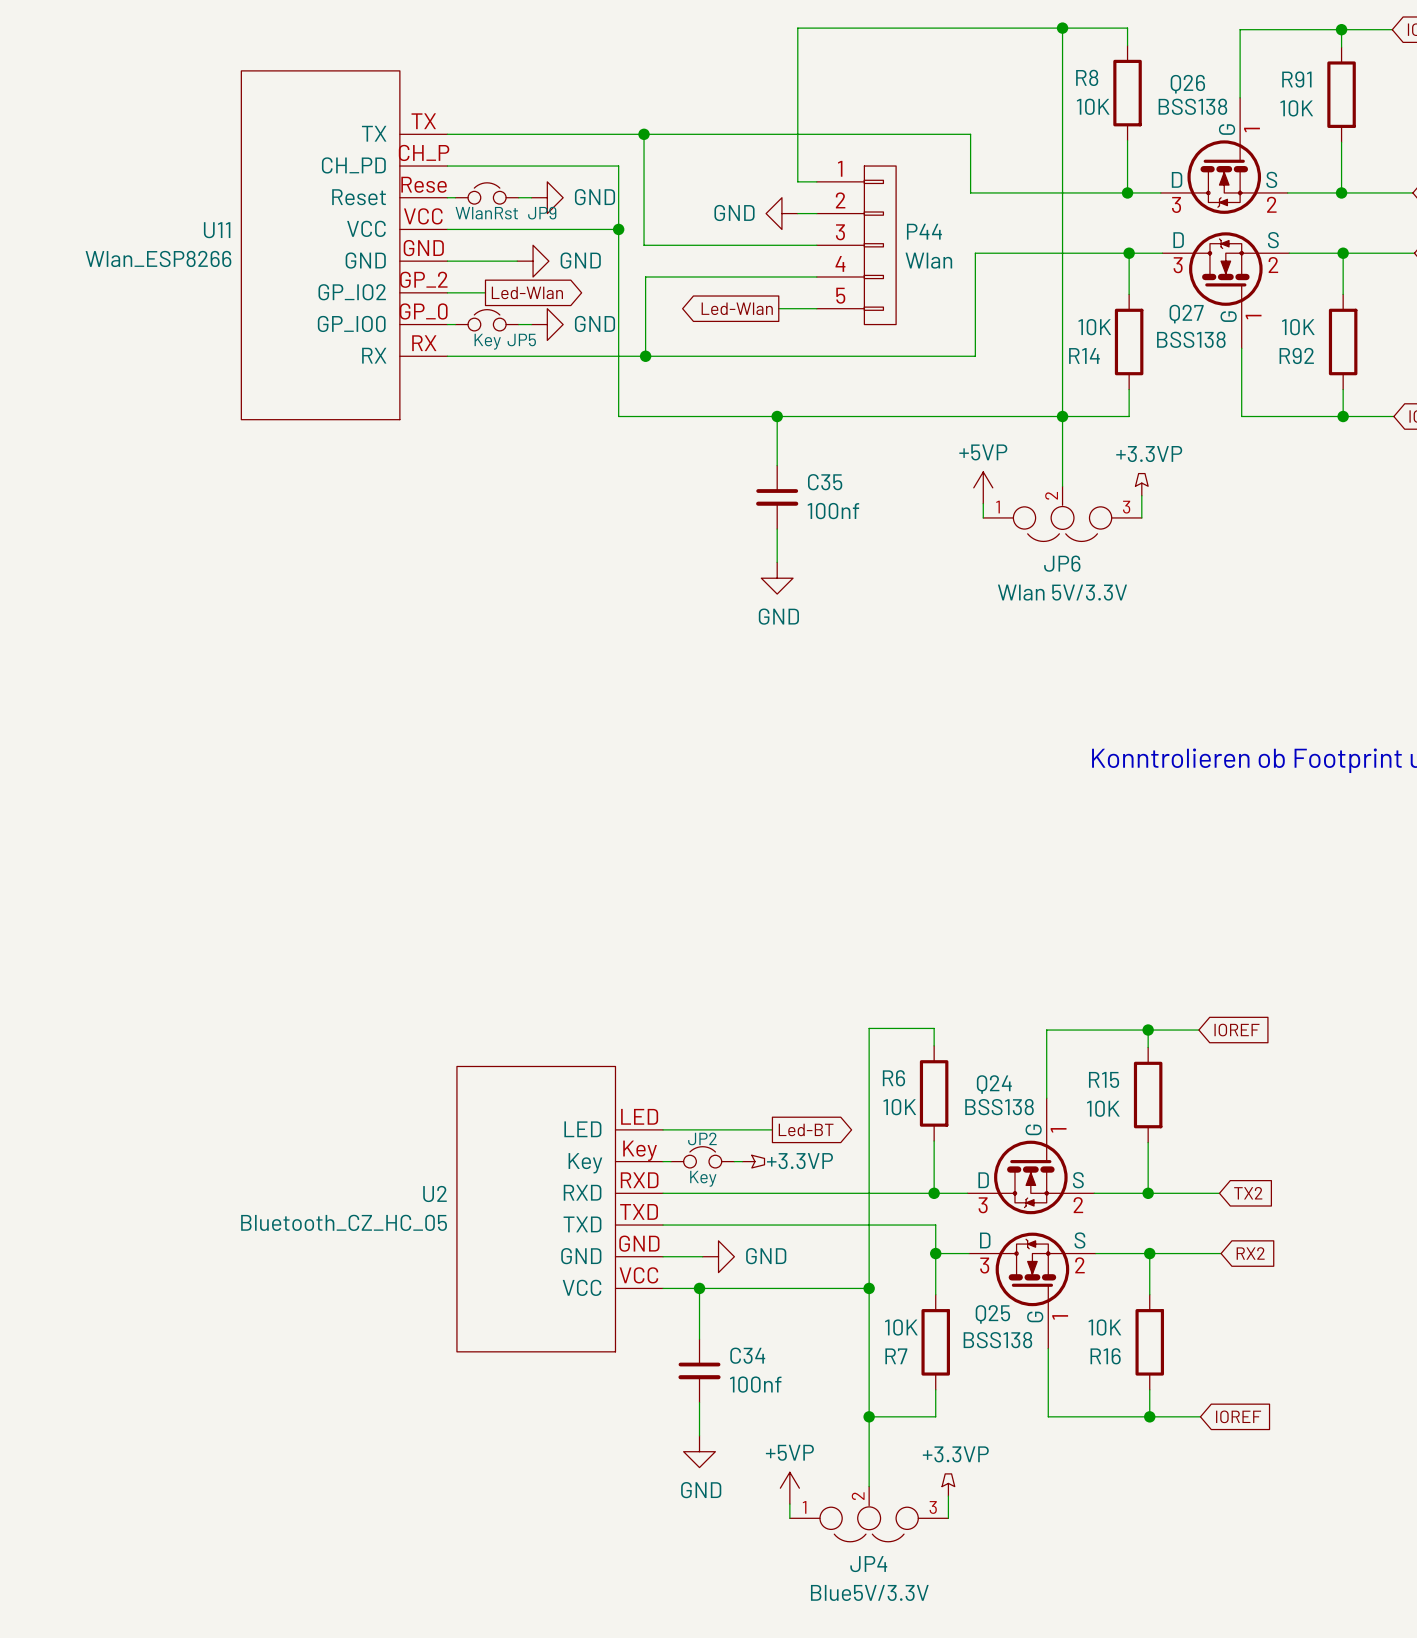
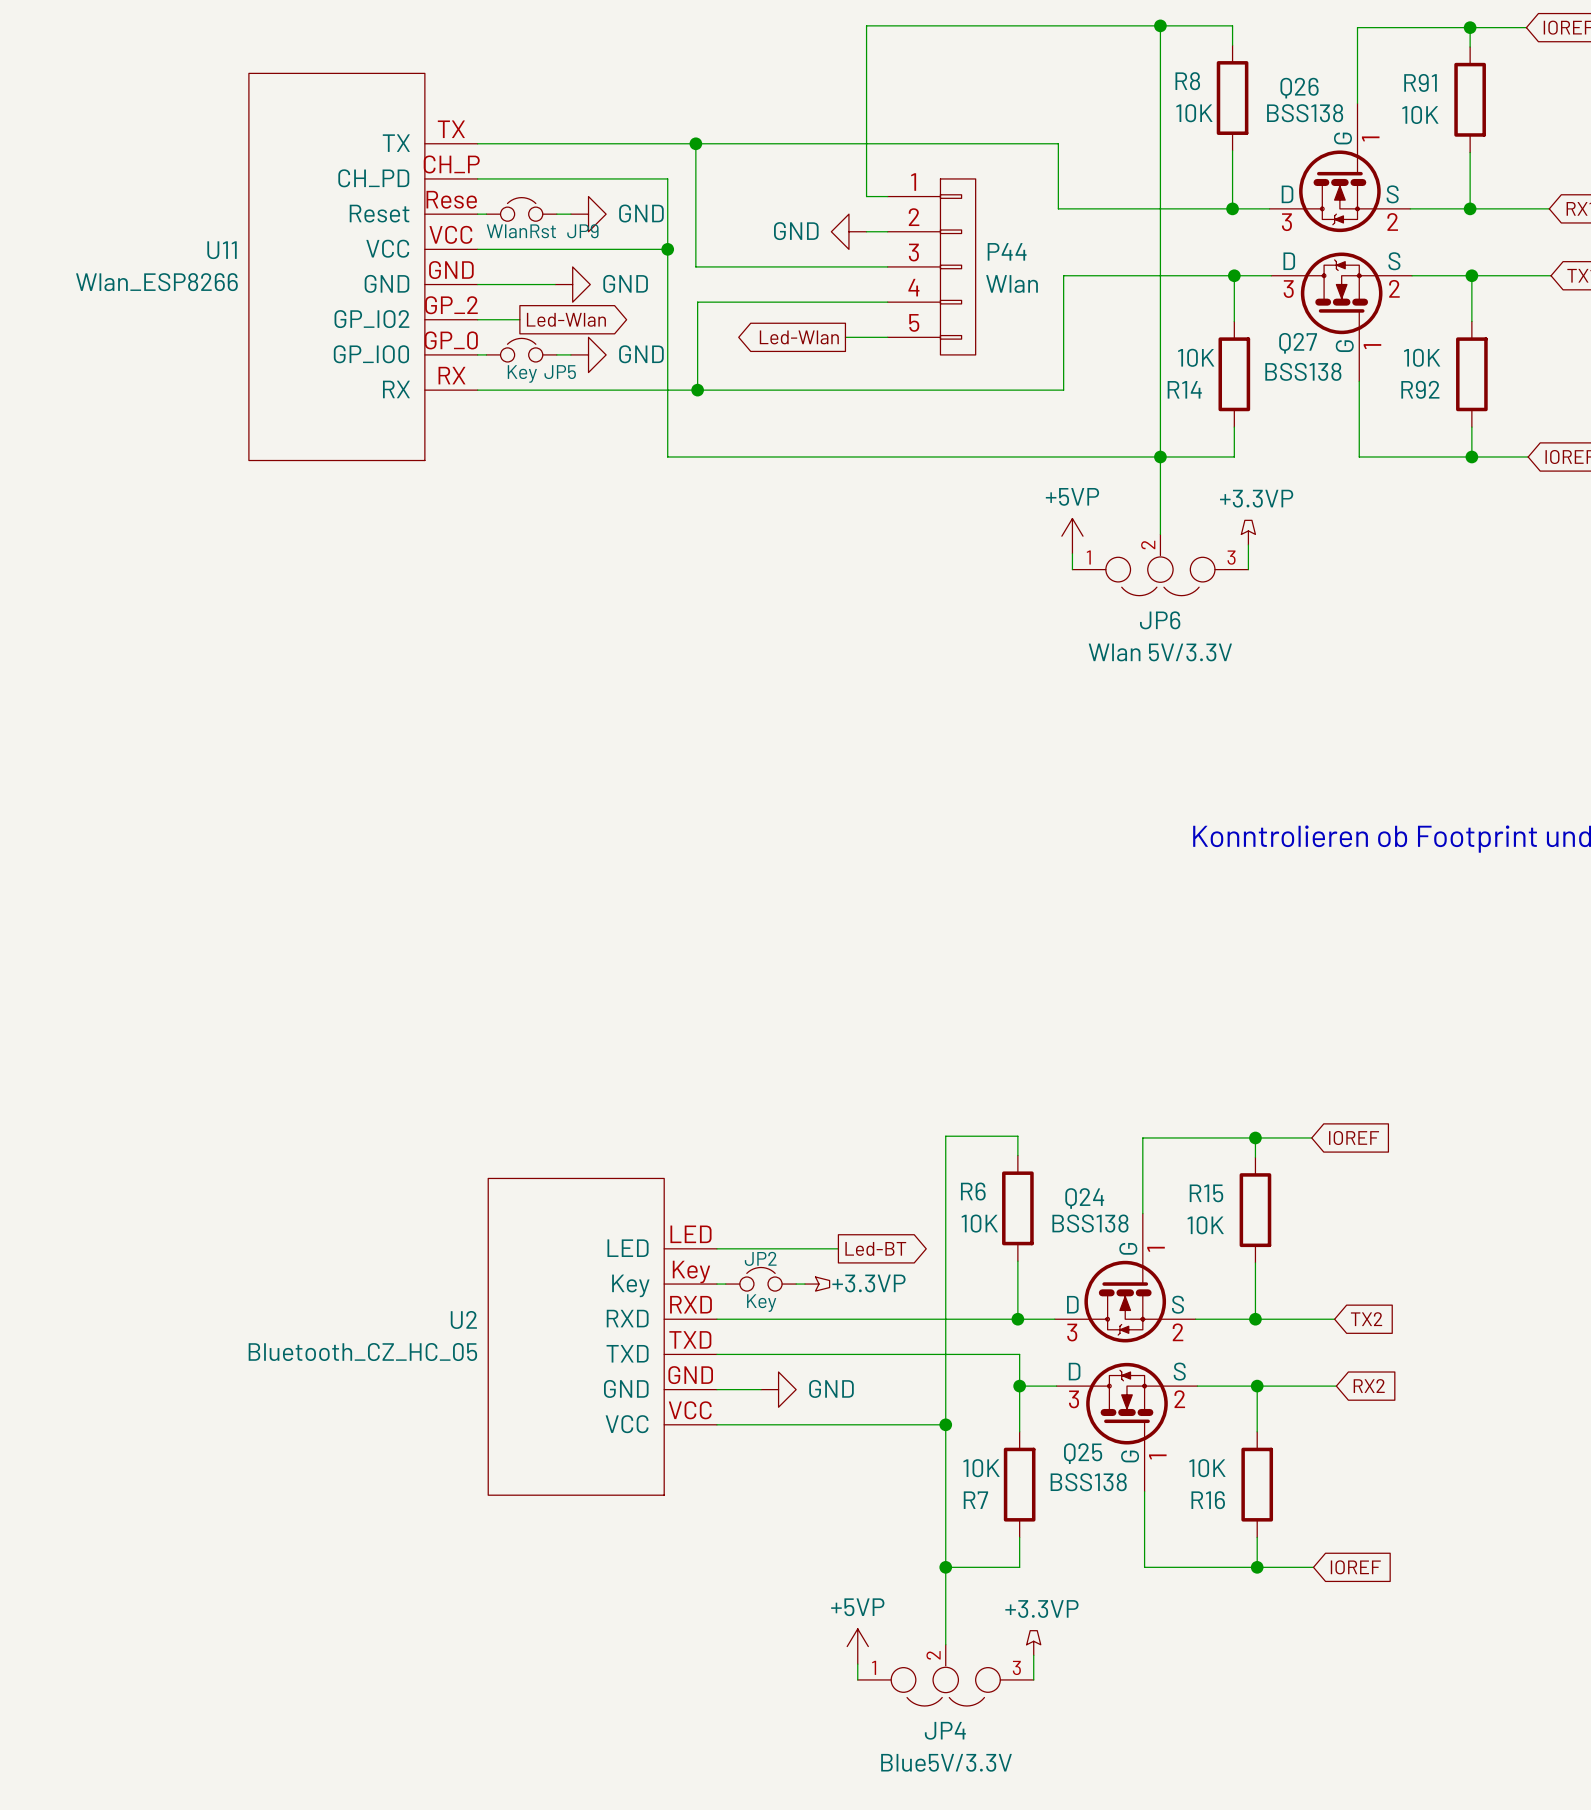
wire: (777, 416) (777, 465) -> none
junction: (777, 416) -> none
C35: 100nf (777, 497) -> none
wire: (777, 529) (777, 562) -> none
power symbol: GND (777, 578) -> none
wire: (699, 1288) (699, 1339) -> none
junction: (699, 1288) -> none
C34: 100nf (699, 1370) -> none
wire: (699, 1402) (699, 1435) -> none
power symbol: GND (699, 1451) -> none

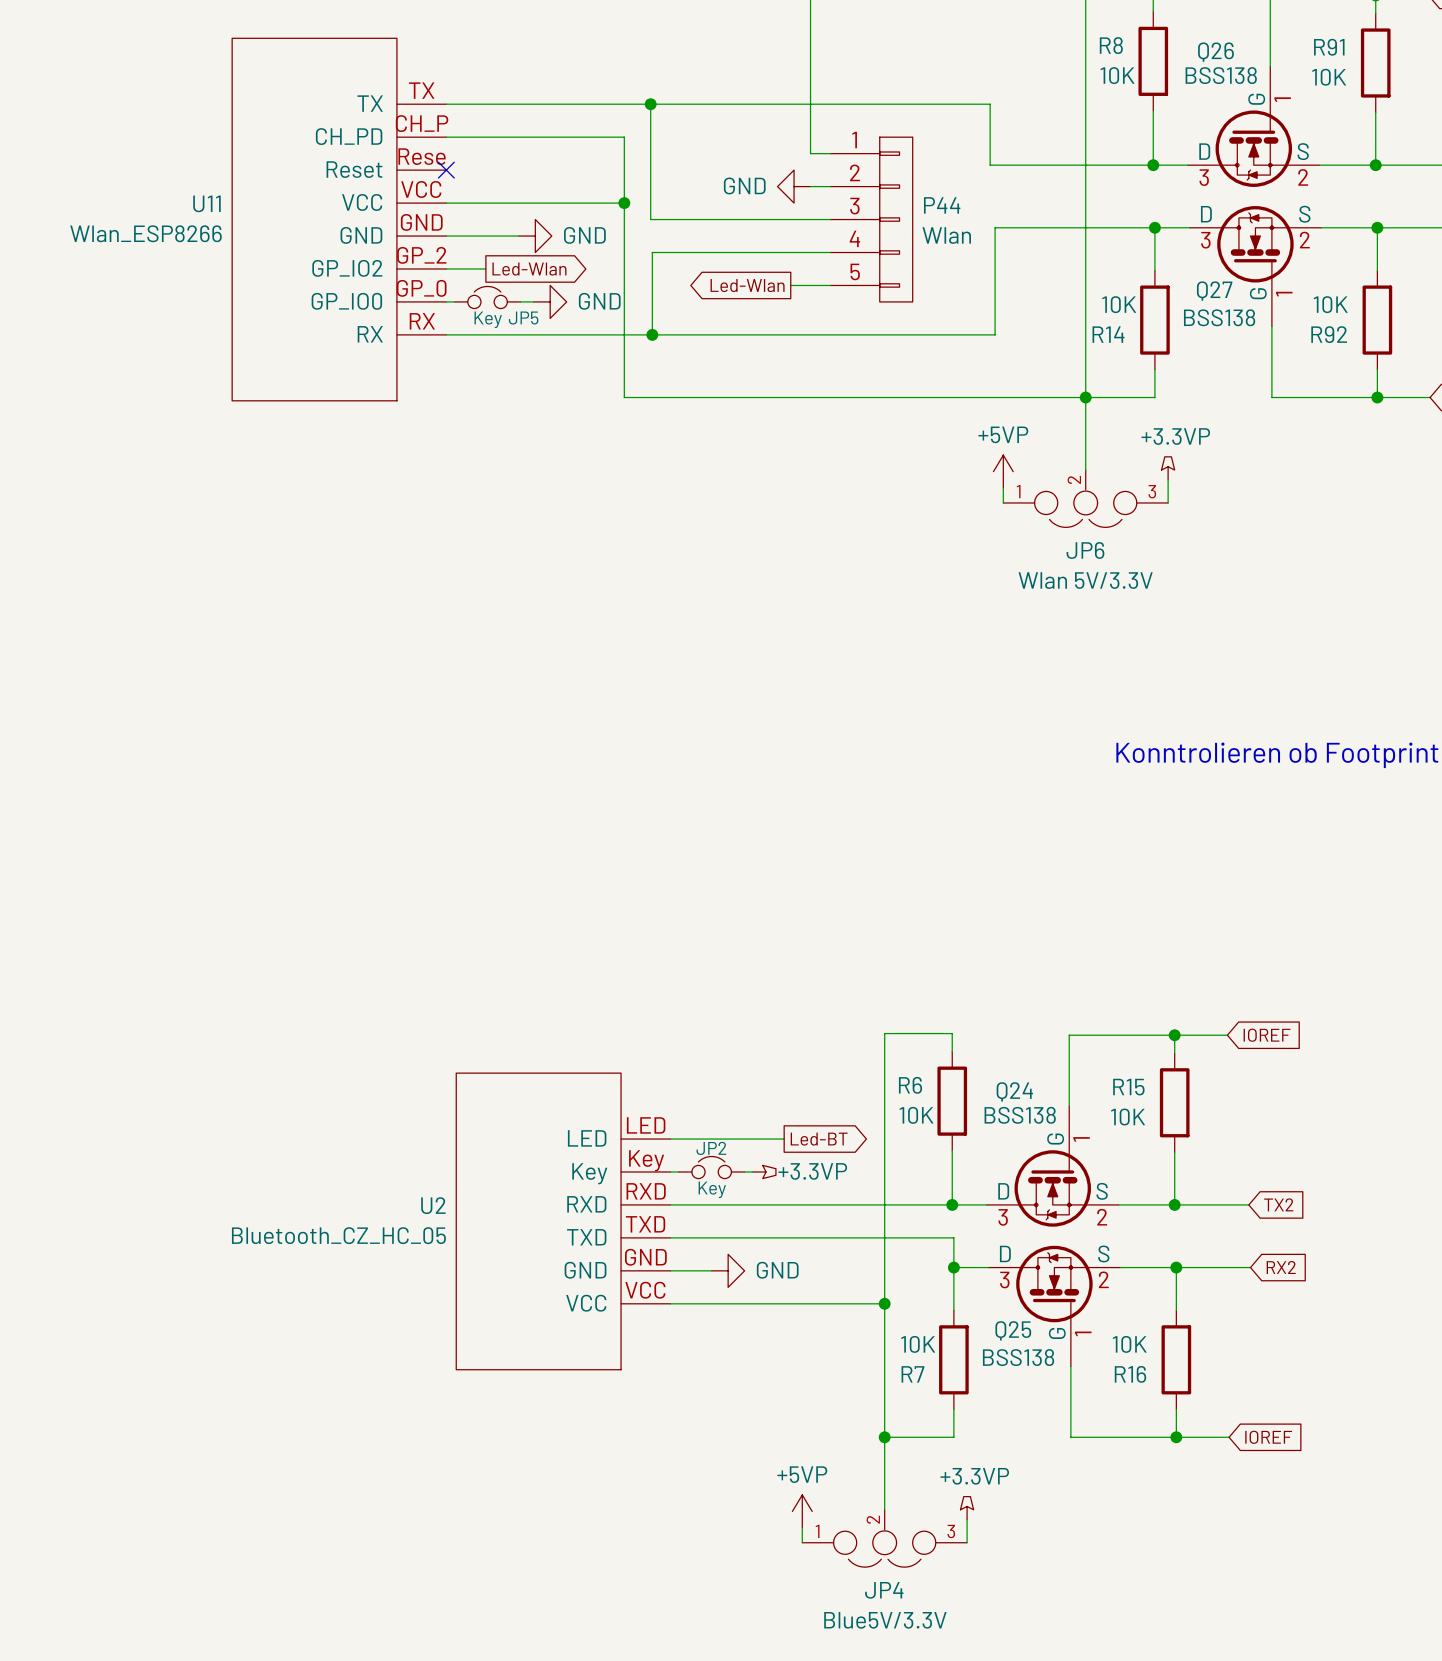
JP9: WlanRst (521, 209) -> none
wire: (477, 214) (486, 214) -> none
no-connect mark: none -> (446, 170)
wire: (556, 214) (570, 214) -> none
power symbol: GND (588, 214) -> none

